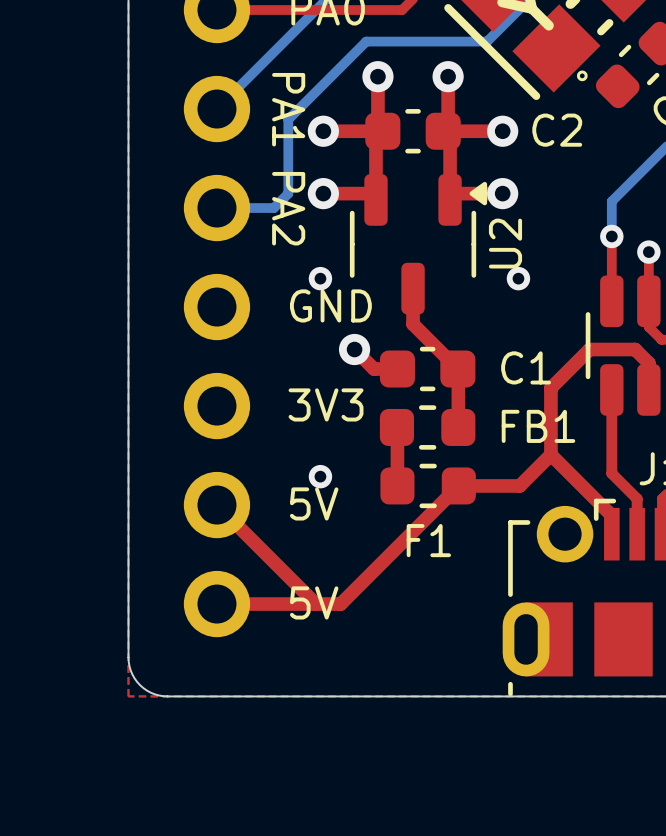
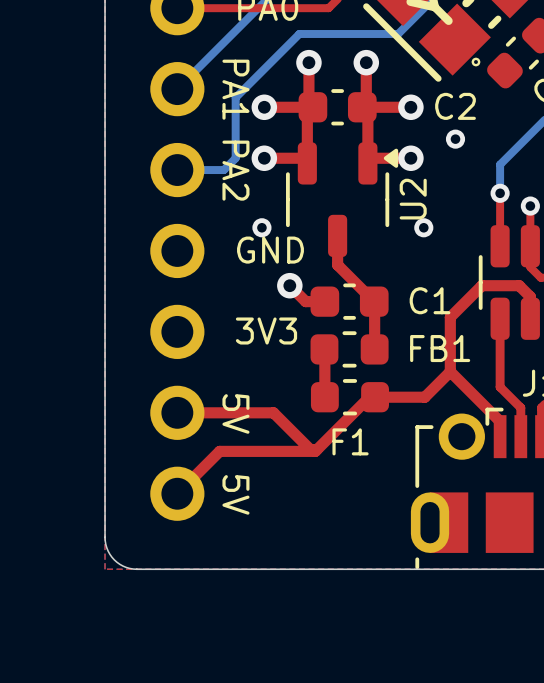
via: none -> (455, 139)
via: (320, 476) -> none
top track: (458, 485) (340, 604) (216, 604) -> (375, 397) (369, 397) (315, 451) (219, 451) (177, 493)
text: 5V (314, 503) -> none
top track: (216, 505) (315, 603) -> (177, 412) (273, 412) (310, 449) (316, 449)
text: none -> 5V (235, 413)
text: 5V (314, 602) -> none
text: none -> 5V (235, 494)

